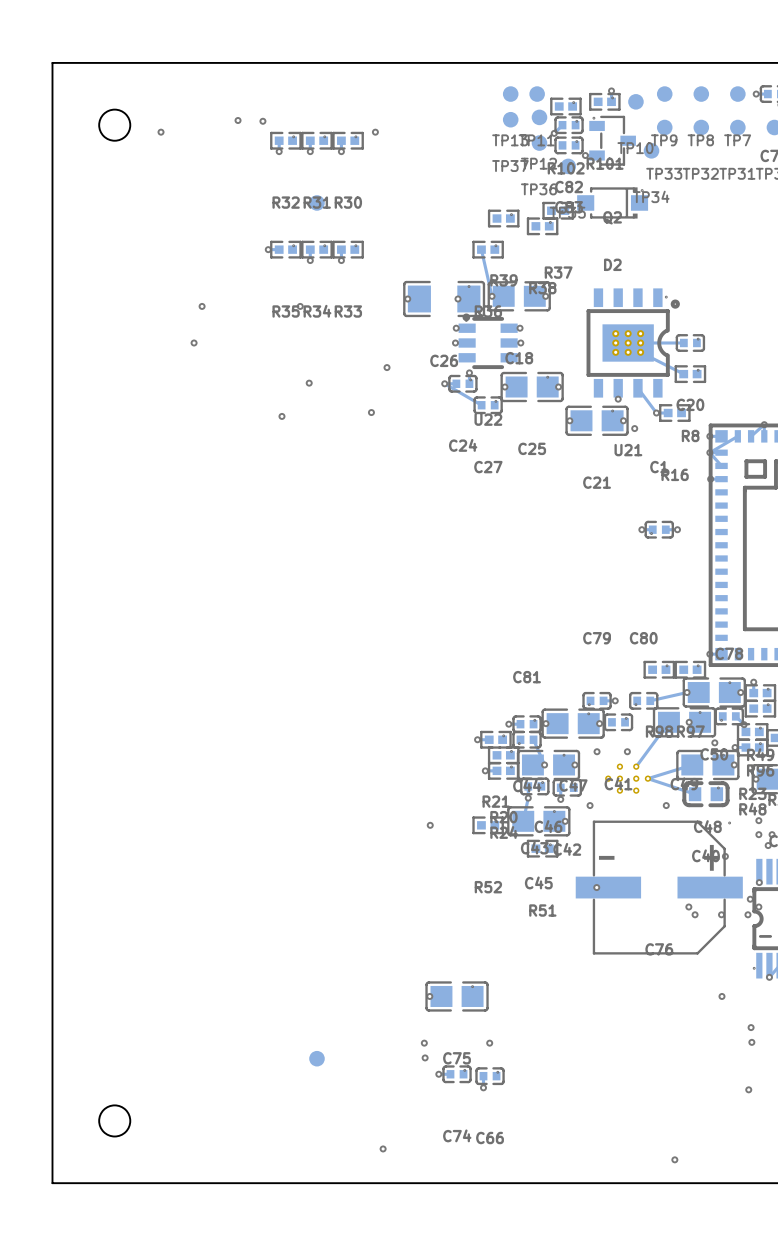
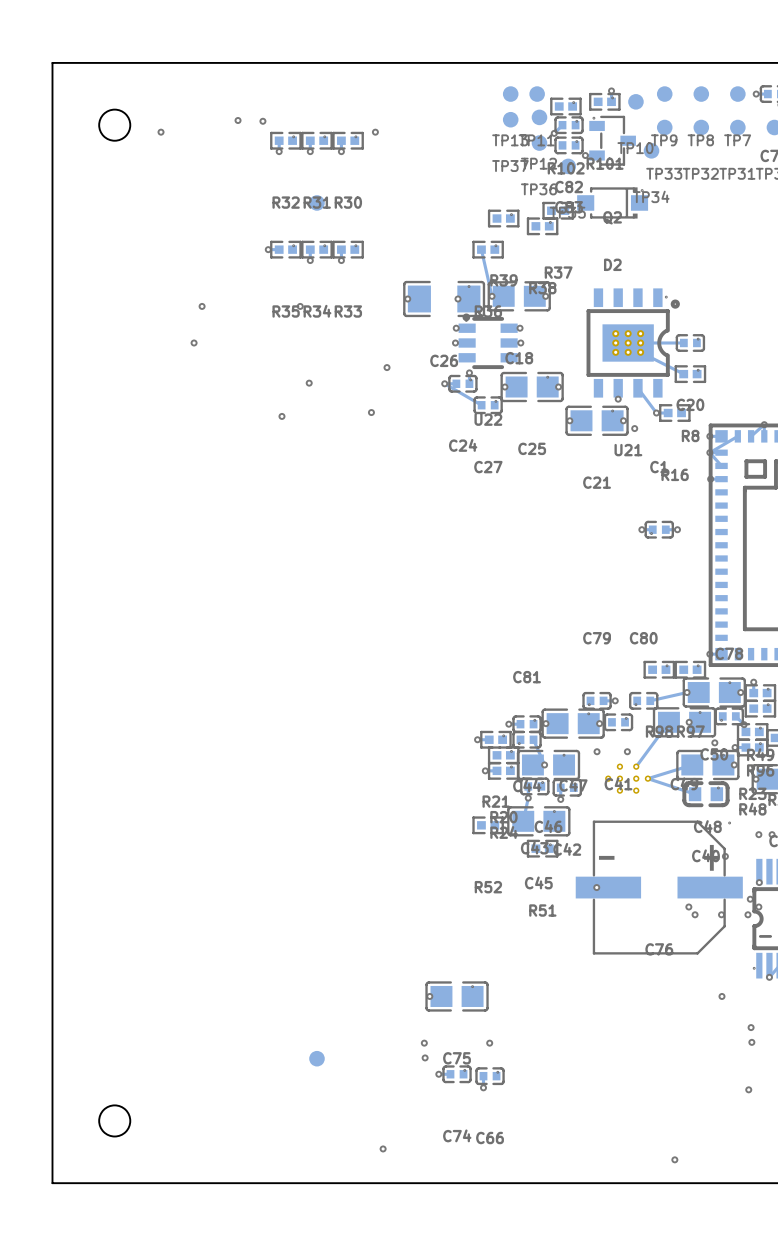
via: (574, 764) -> none
via: (590, 805) -> none
via: (666, 805) -> none
via: (758, 820) -> none
via: (565, 821) -> none
via: (430, 825) -> none
via: (768, 845) -> none

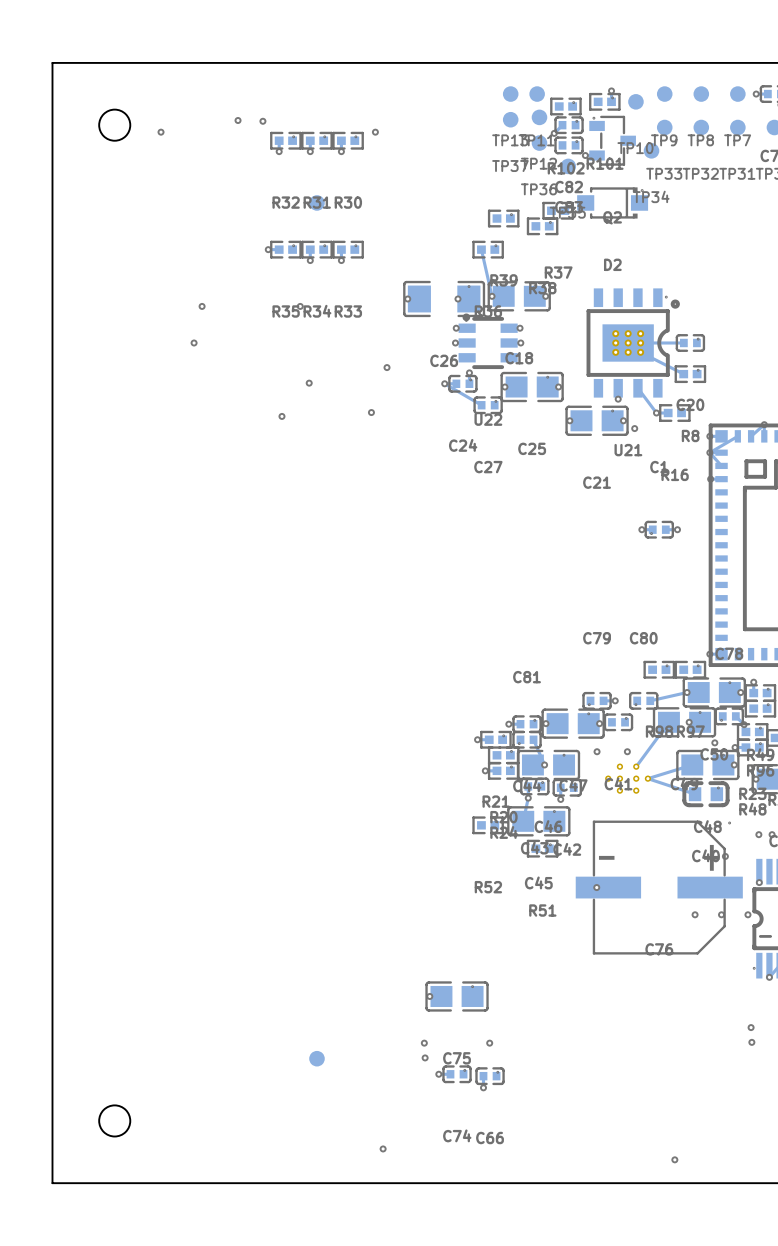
via: (750, 899) -> none
via: (688, 907) -> none
via: (758, 907) -> none
via: (721, 996) -> none
via: (748, 1089) -> none

